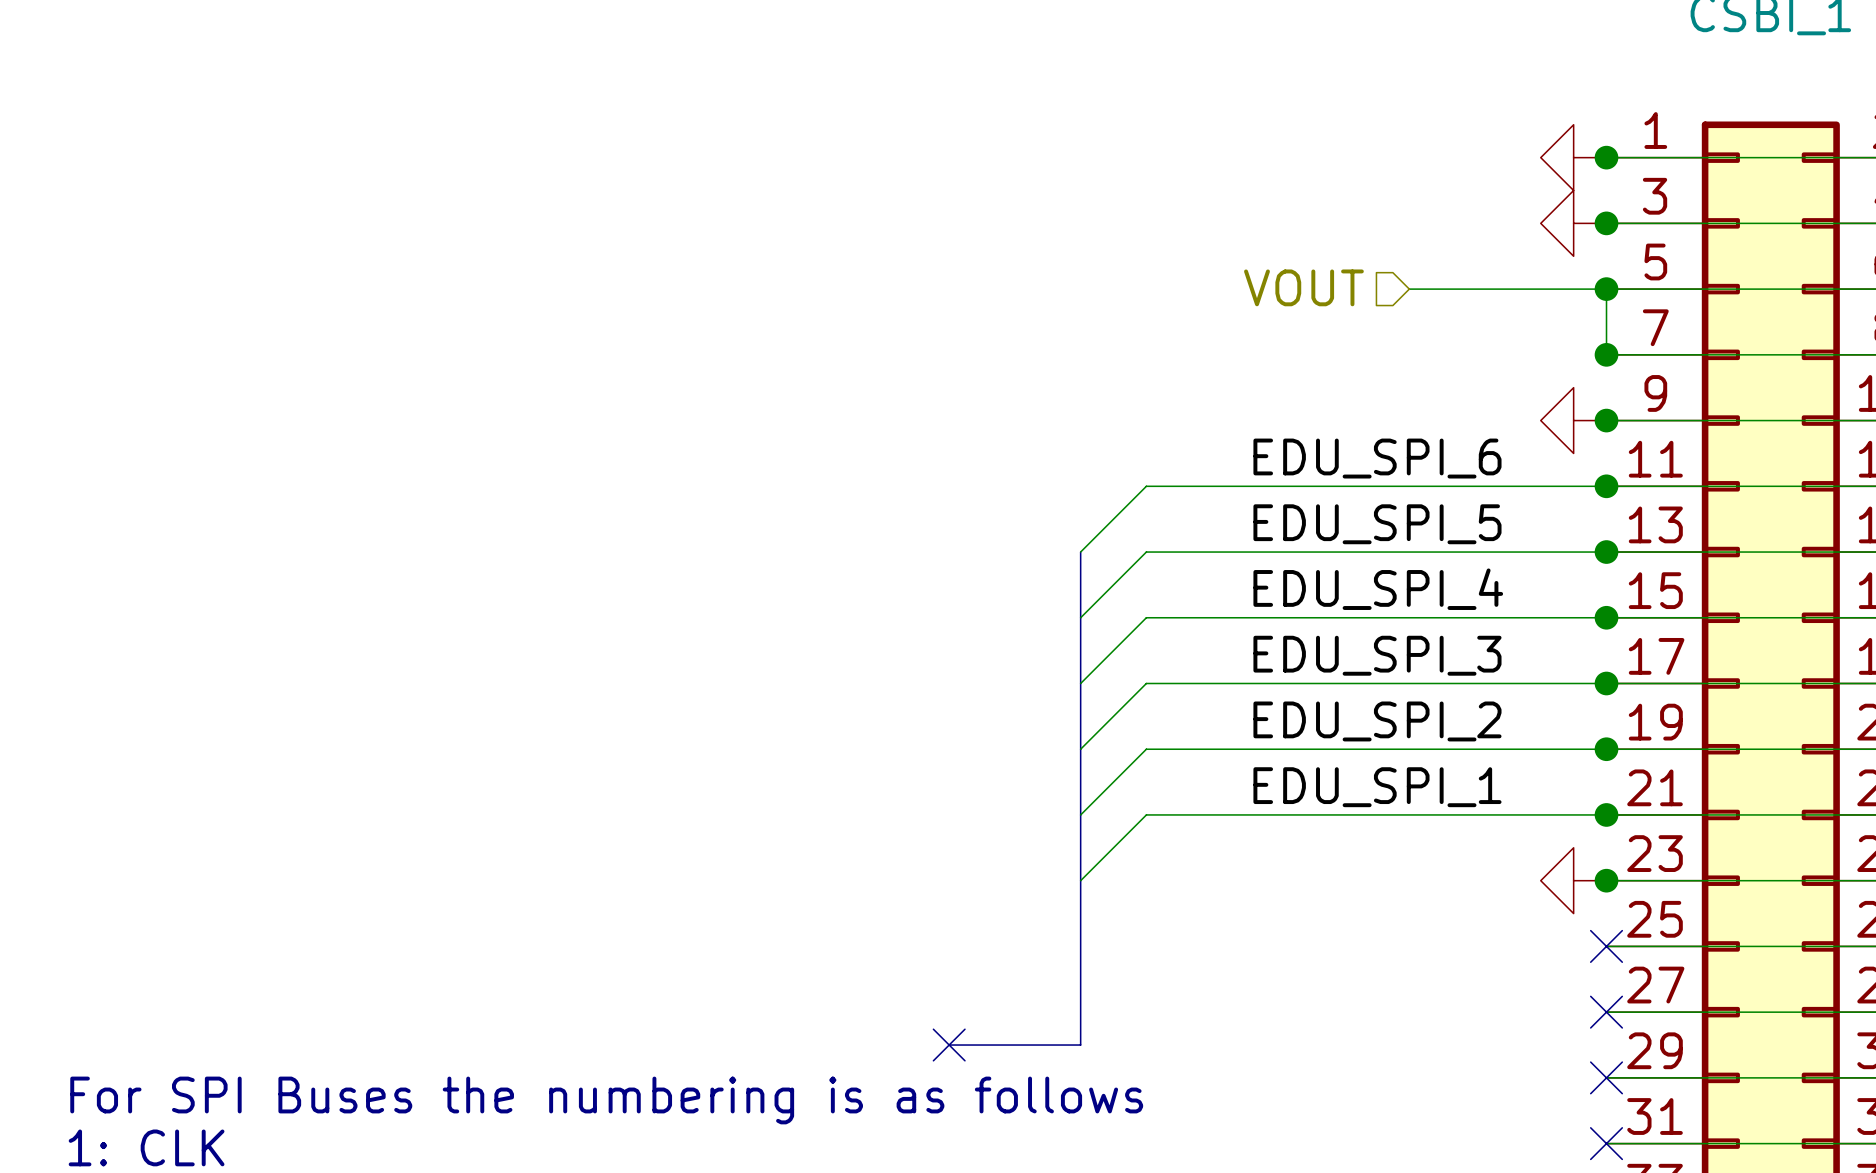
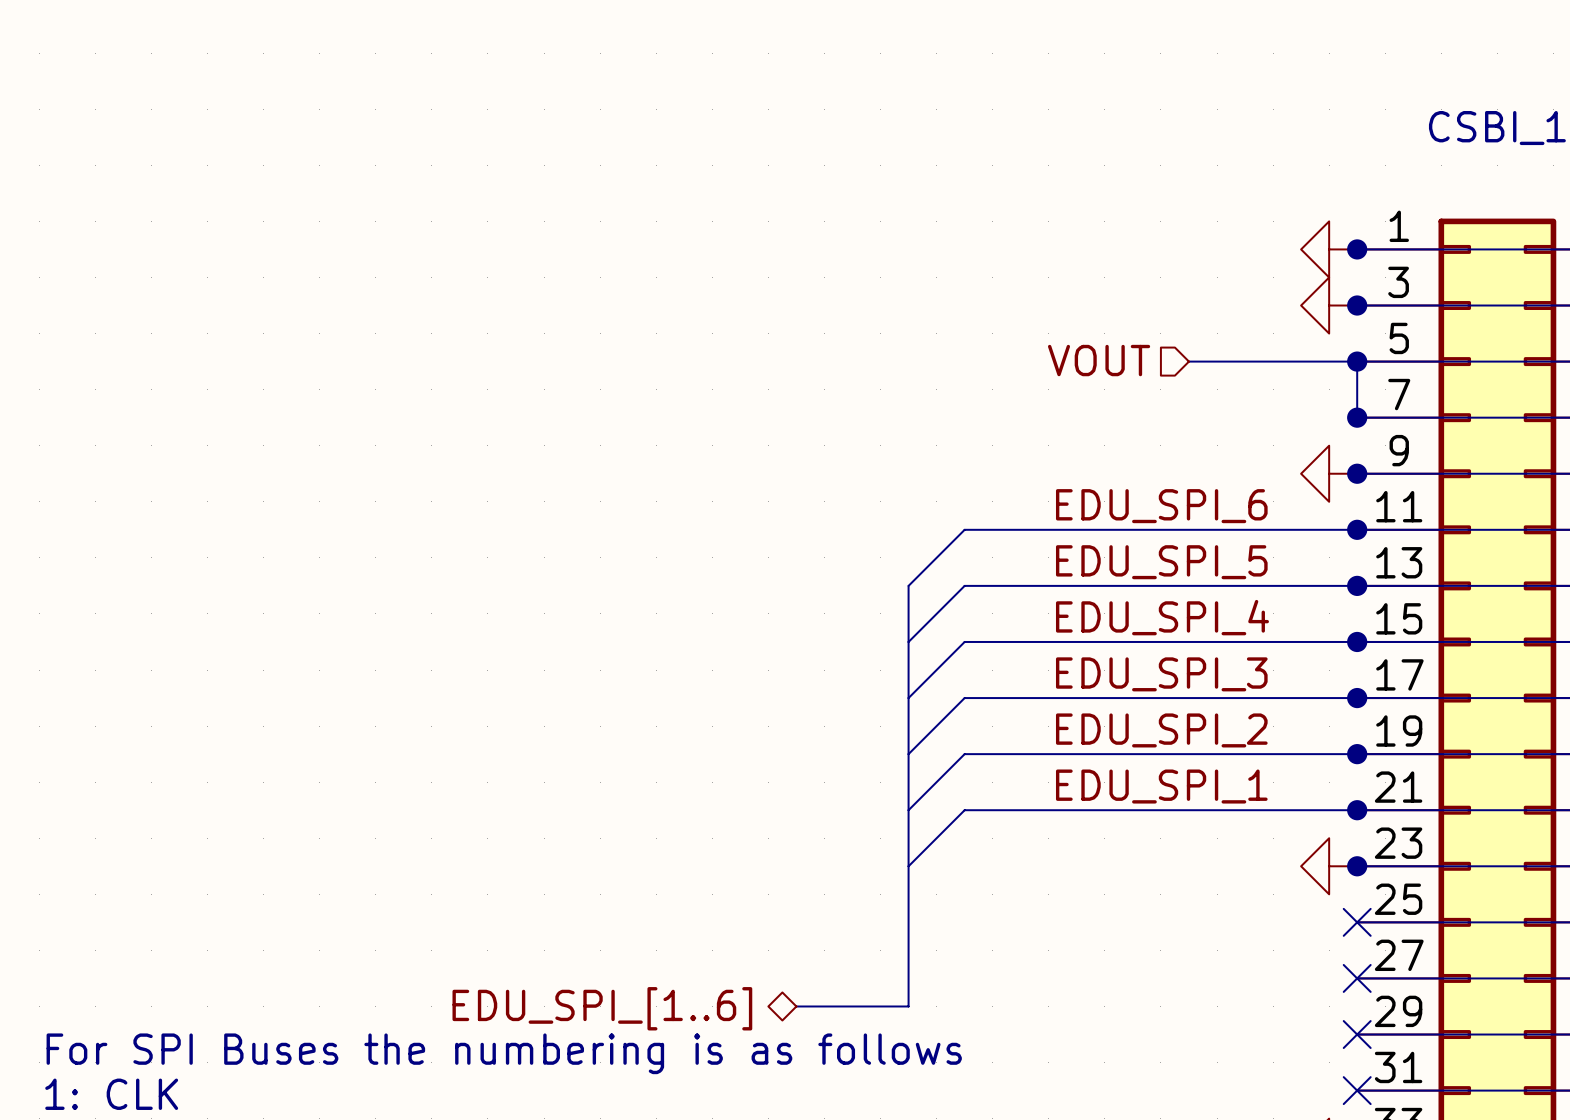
no-connect mark: (949, 1045) -> none
hierarchical label: none -> EDU_SPI_[1..6] (602, 1008)

